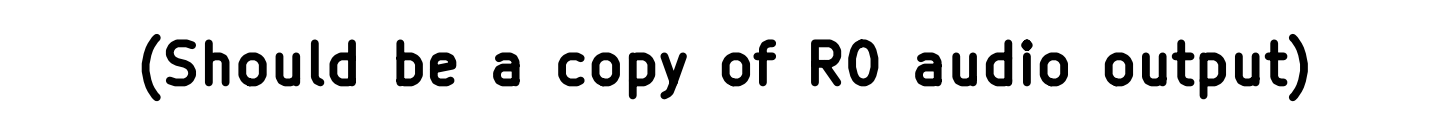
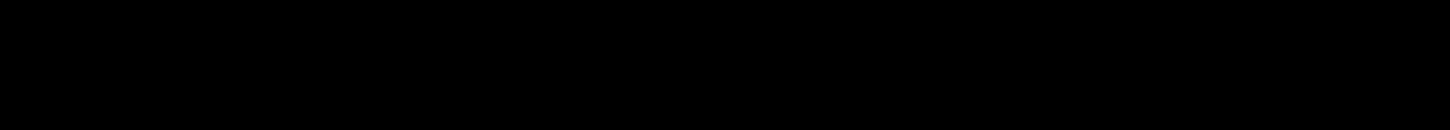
text: (Should be a copy of R0 audio output) (724, 67) -> none

